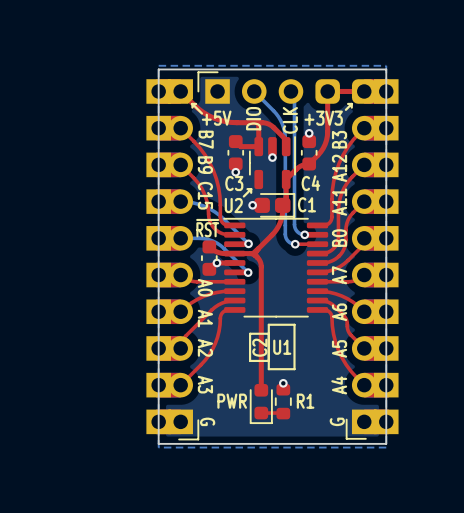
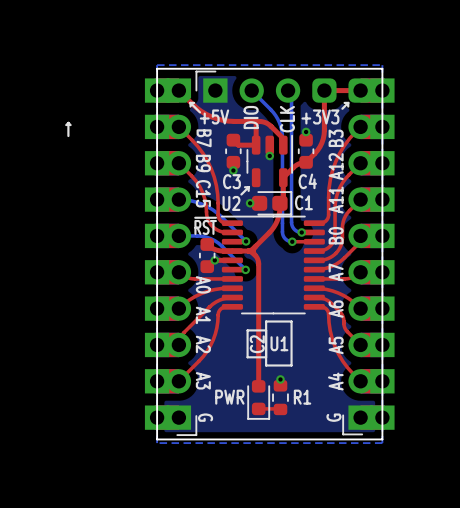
line: none -> (68, 122) (66, 125)
line: none -> (68, 122) (68, 135)
line: none -> (68, 122) (70, 125)

